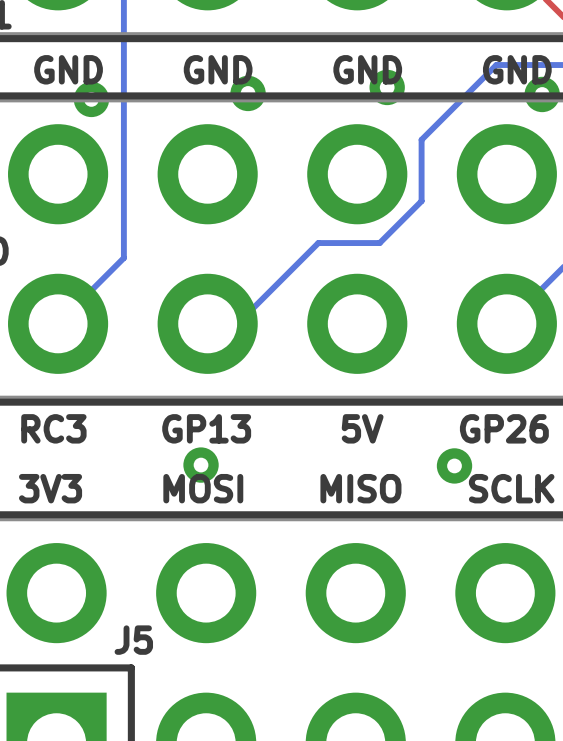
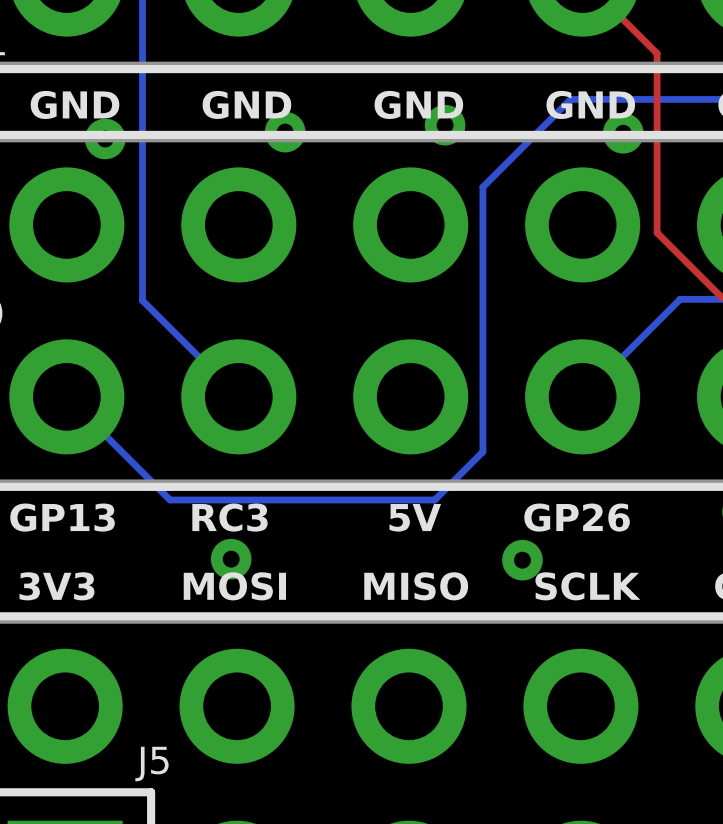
bottom track: (421, 139) (421, 201) (379, 243) (318, 243) (237, 323) (207, 323) -> (484, 185) (482, 187) (482, 451) (434, 500) (170, 500) (66, 396)
bottom track: (123, 240) (123, 258) (58, 323) -> (142, 300) (238, 396)
text position: RC3 (53, 428) -> RC3 (230, 517)
text position: GP13 (206, 428) -> GP13 (62, 517)

